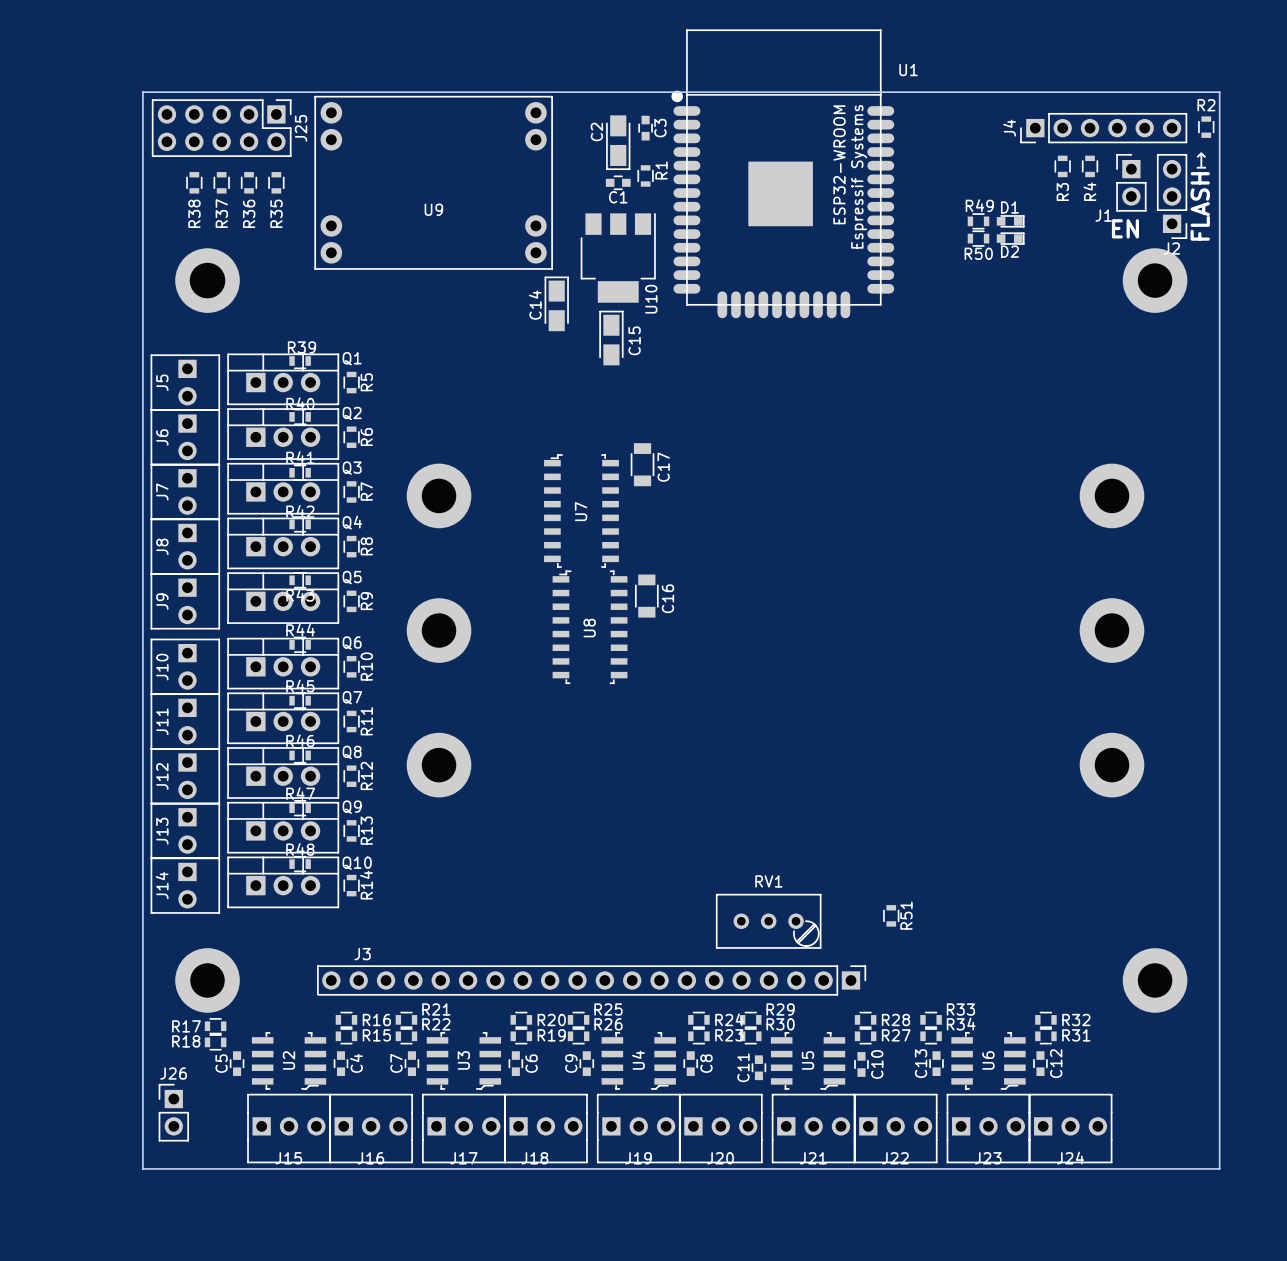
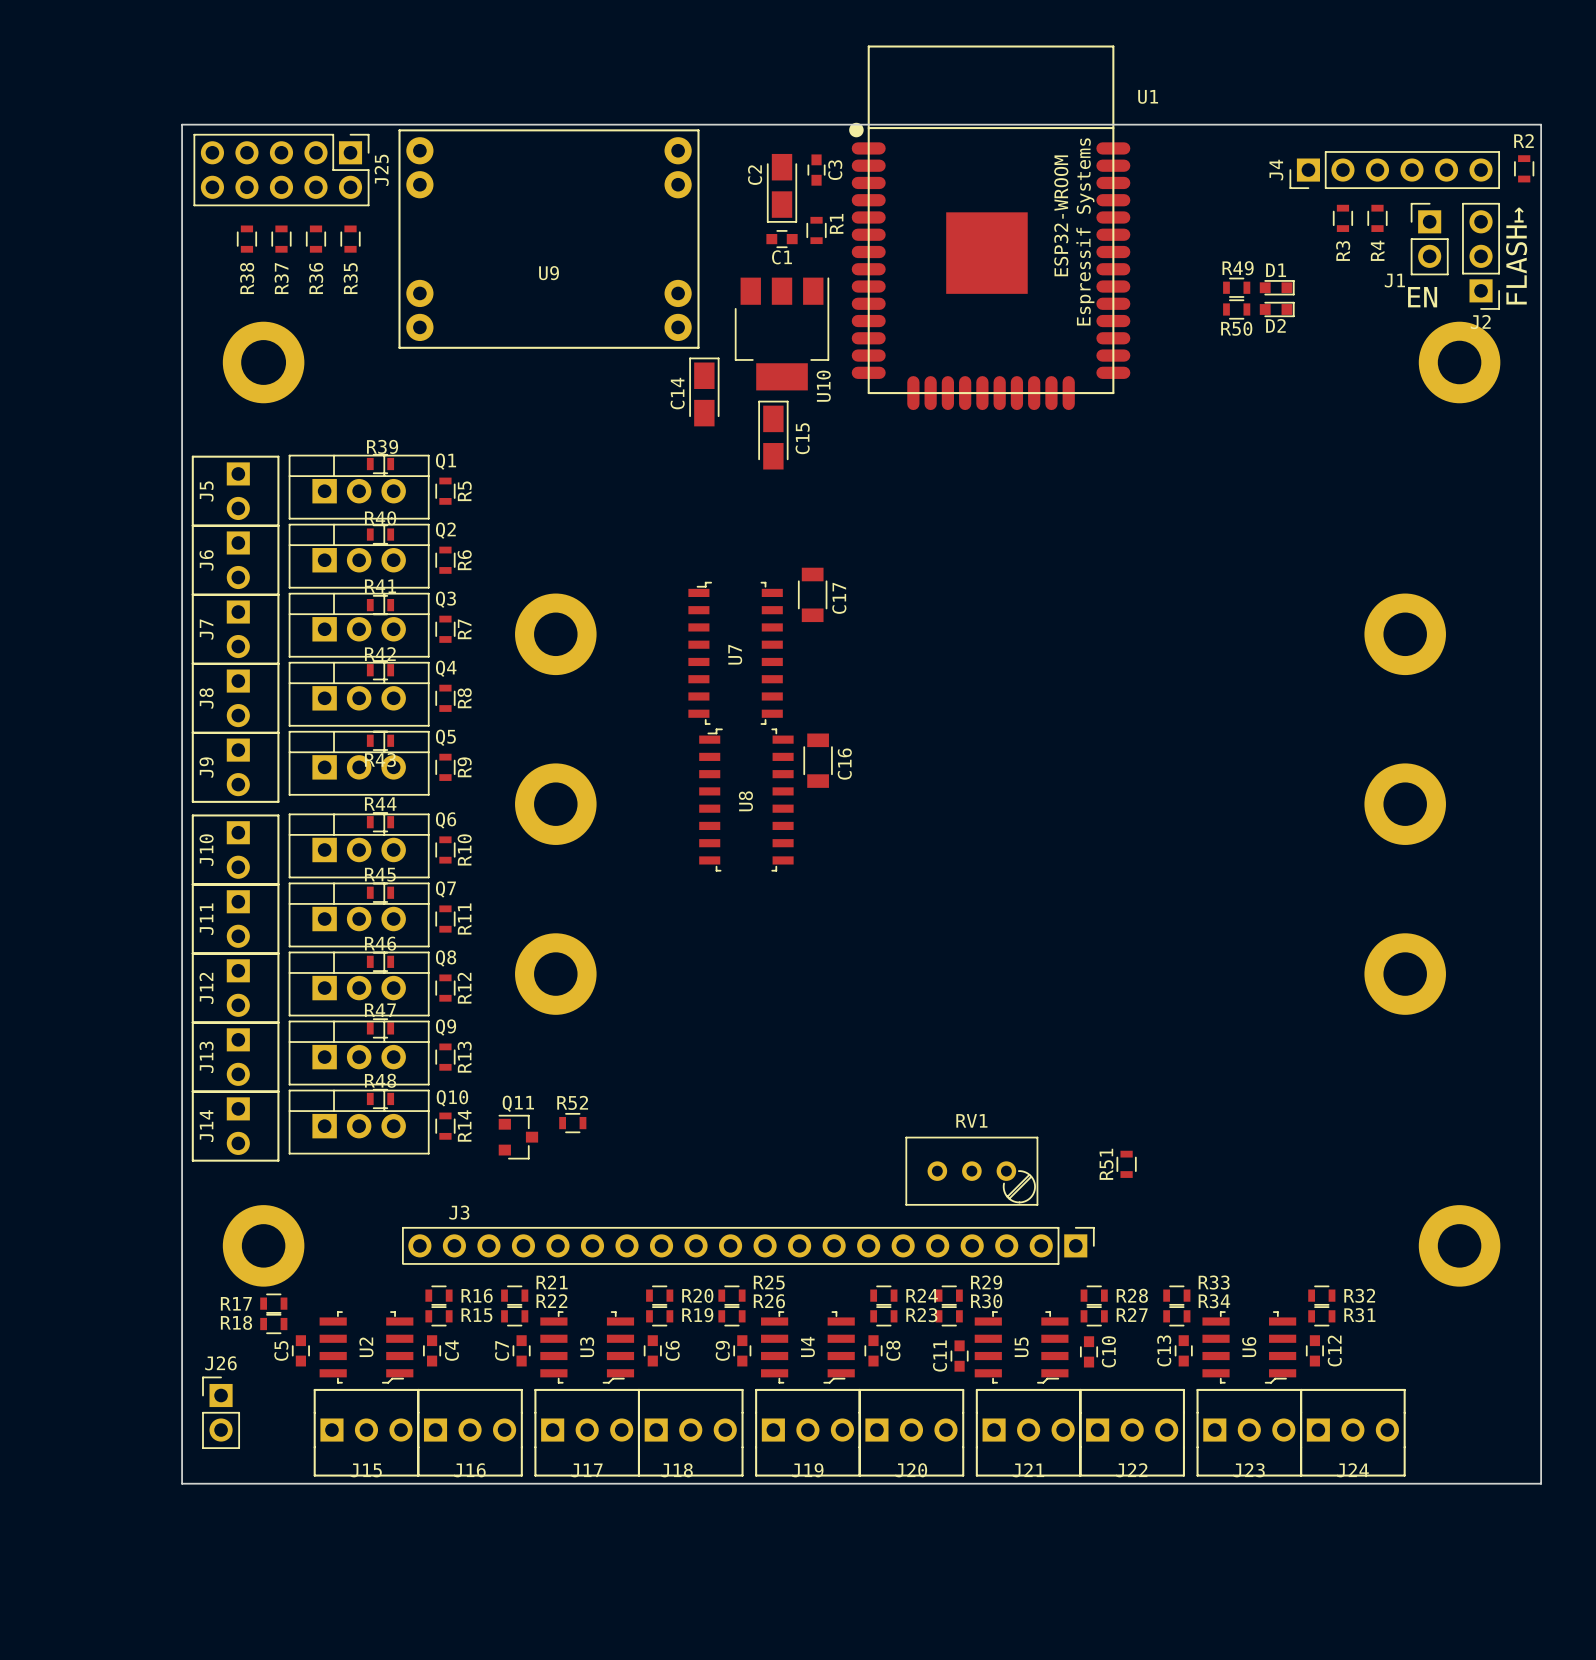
R52: none -> (572, 1123)
Q11: none -> (518, 1137)
R51 name position: R51 (906, 915) -> R51 (1106, 1164)

